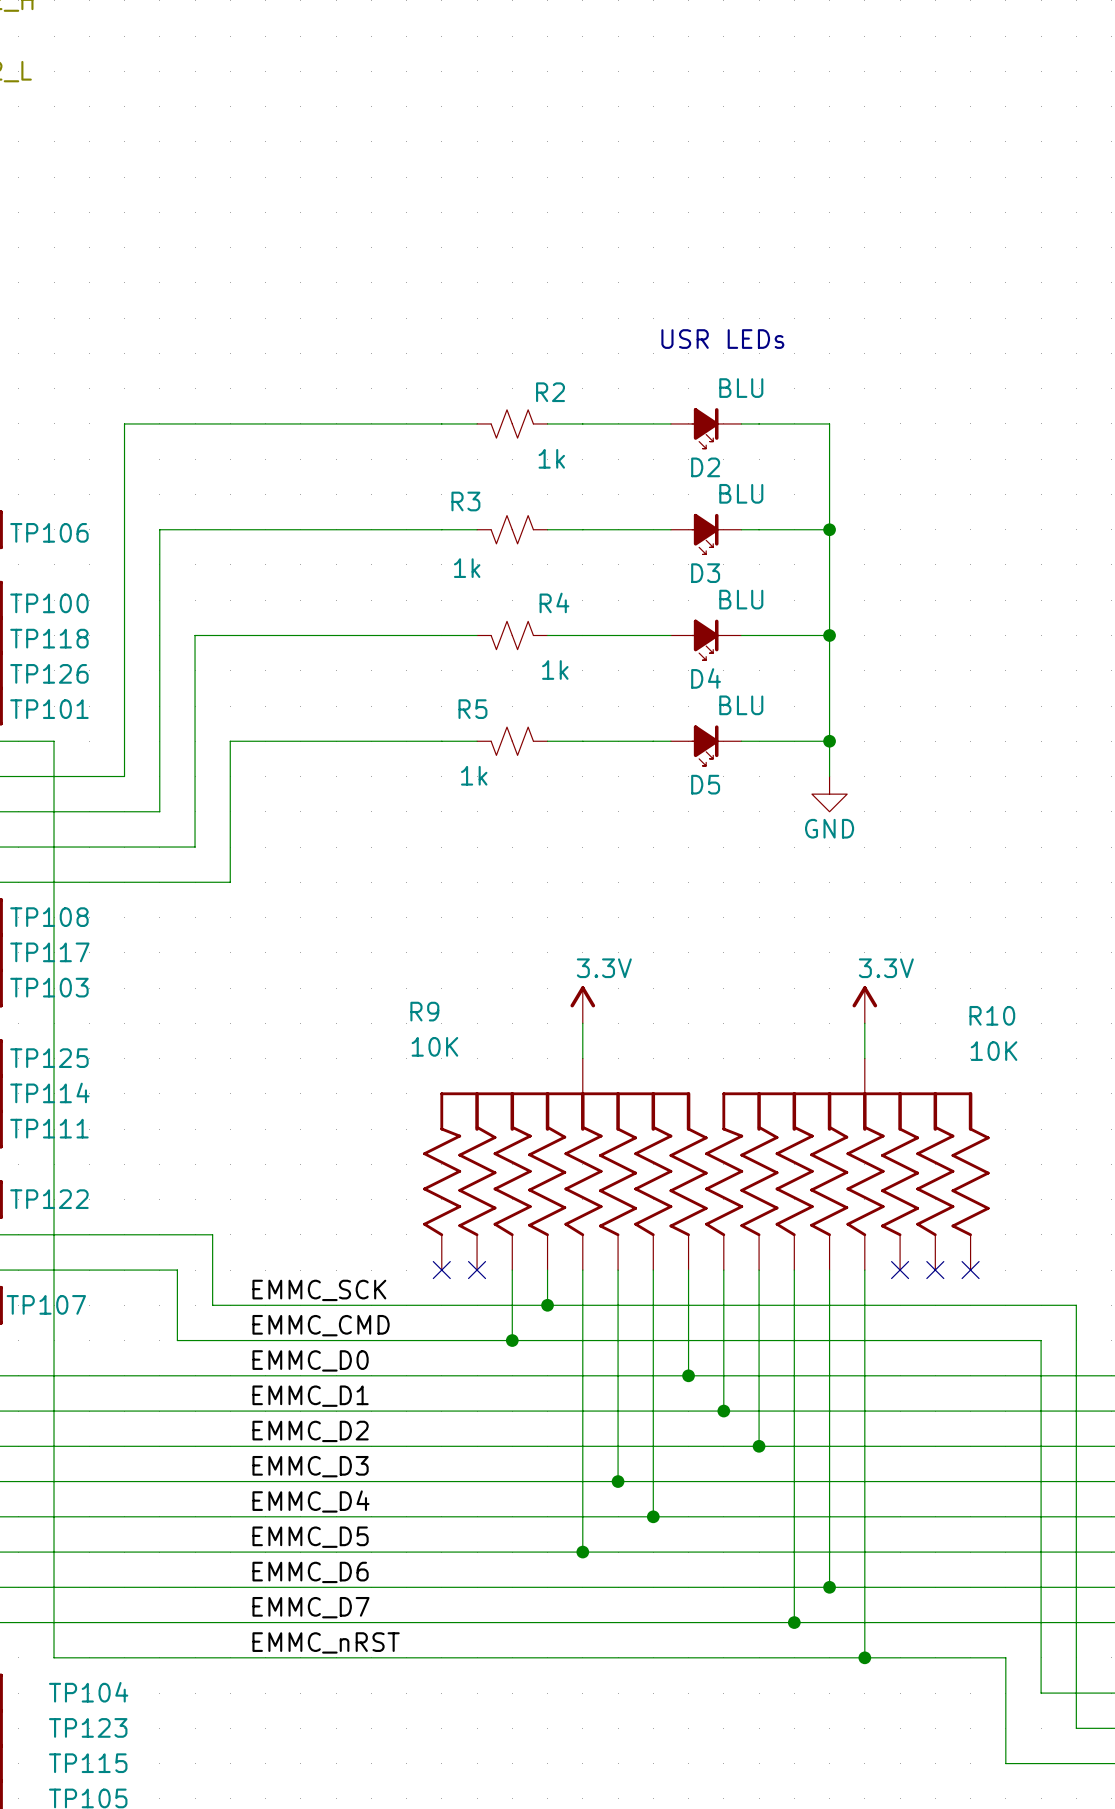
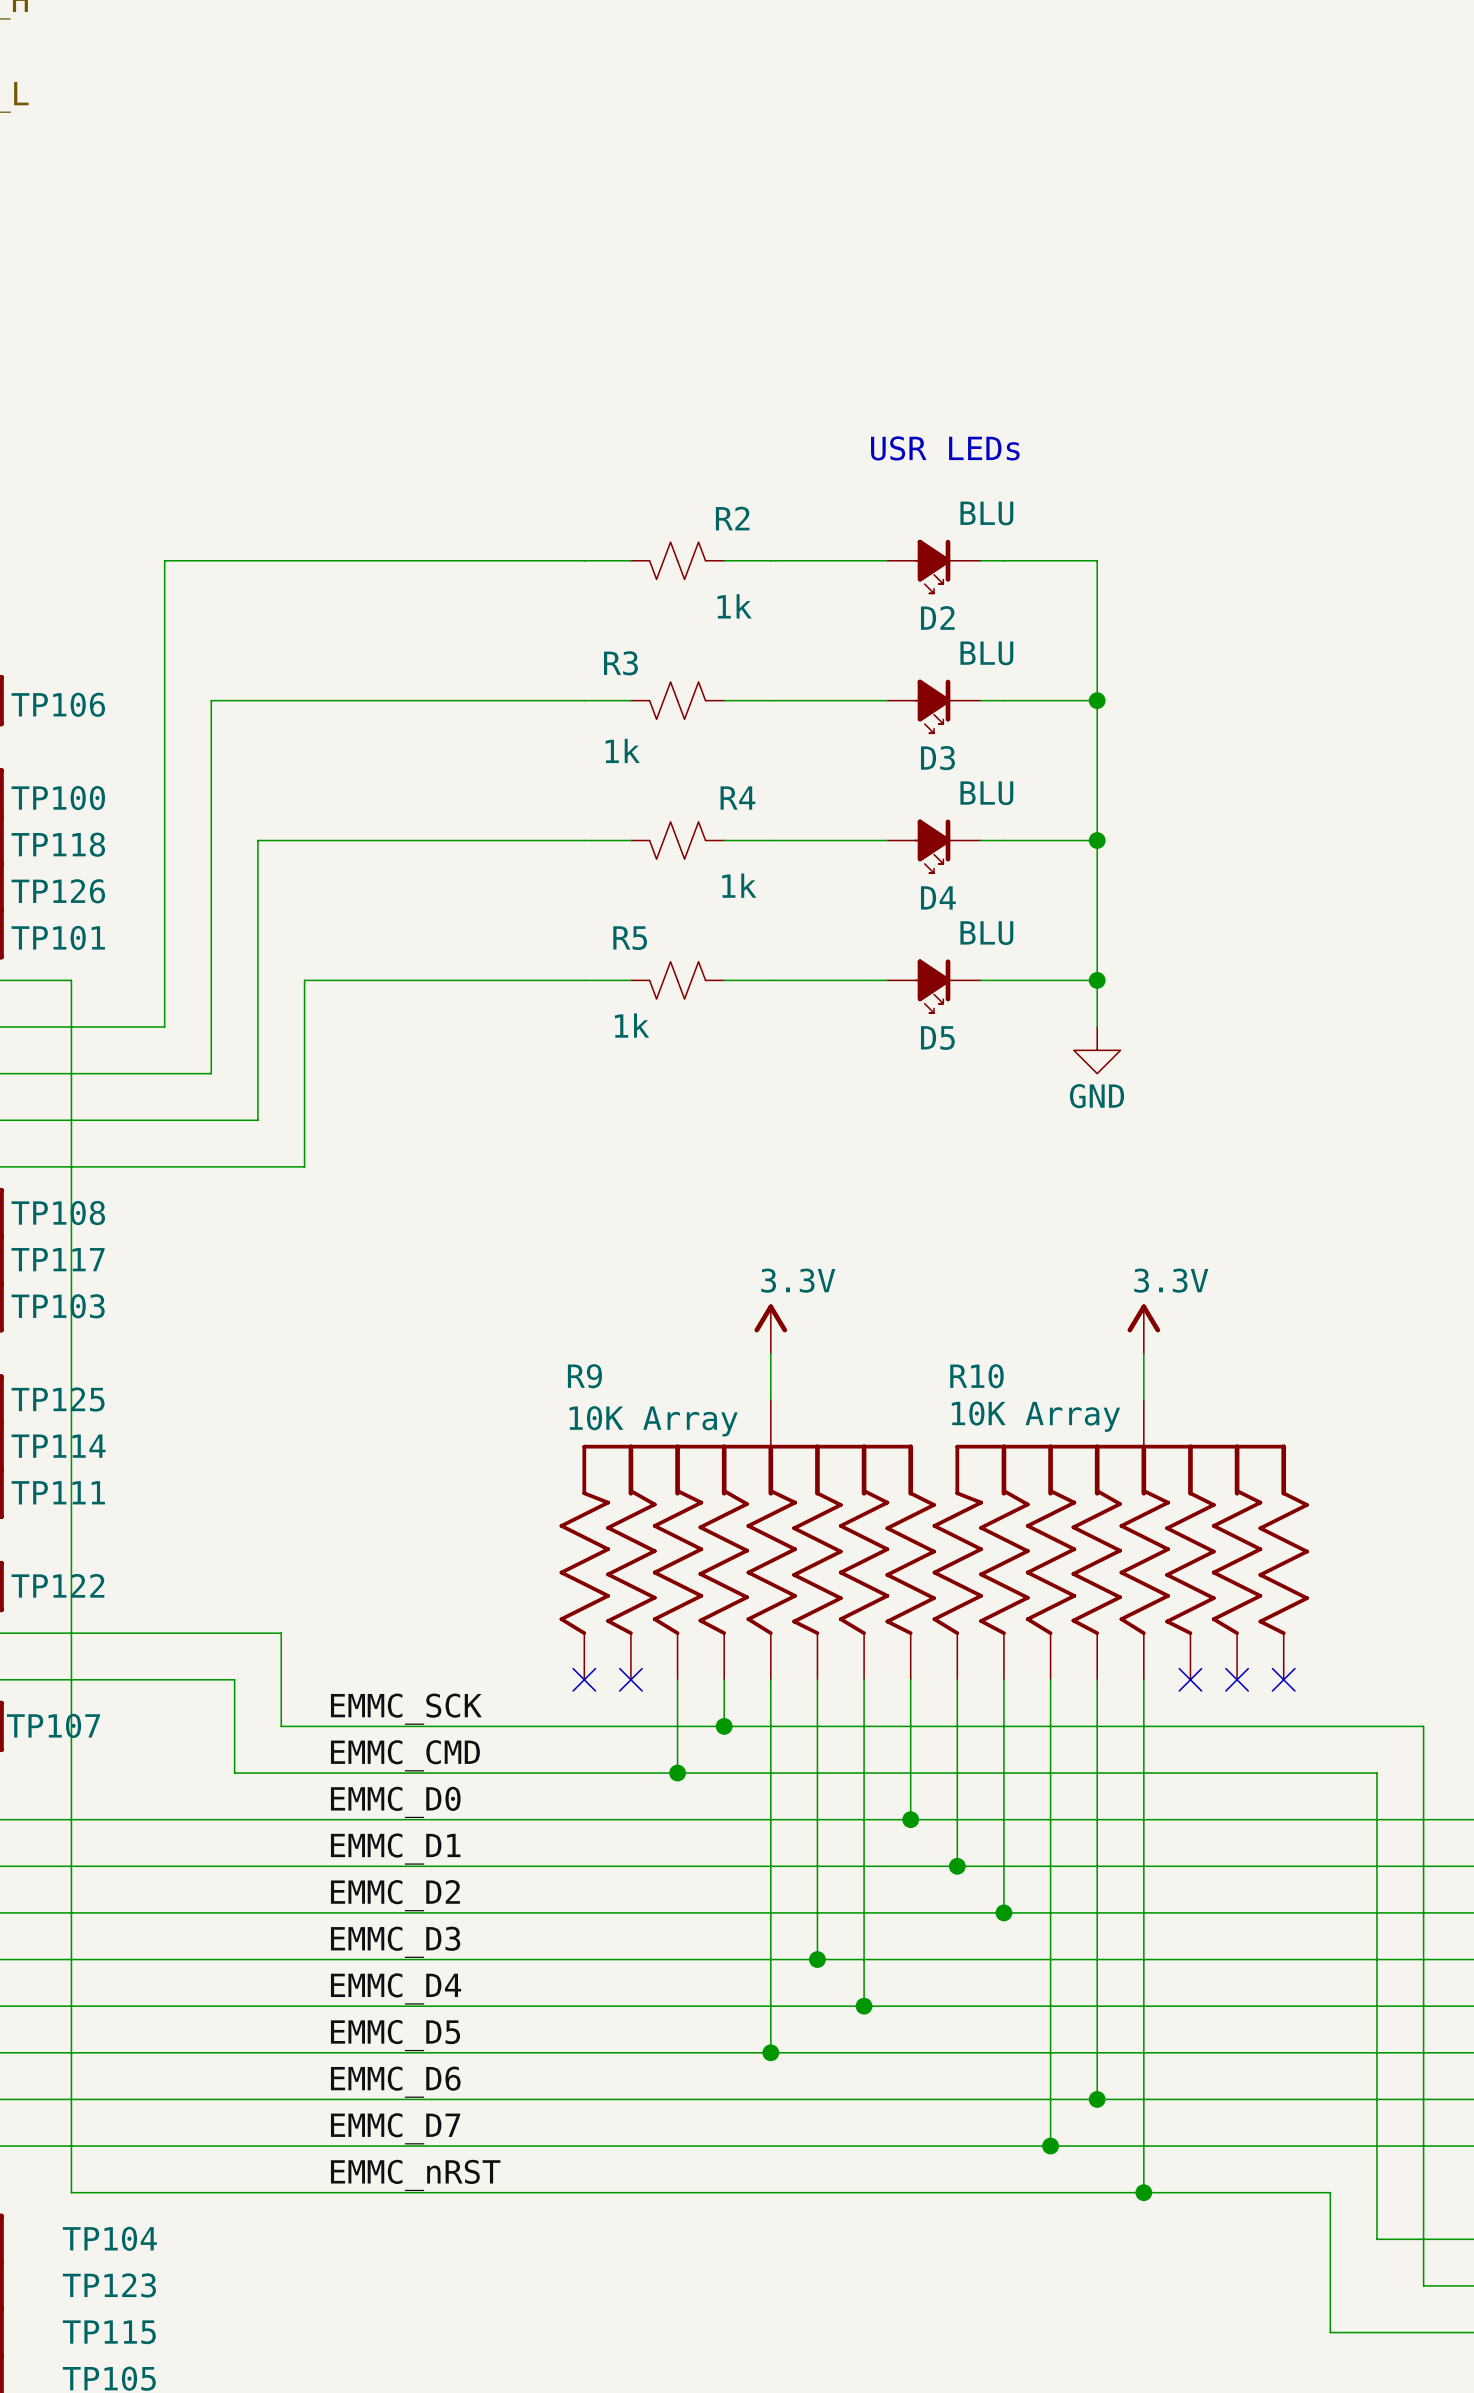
R9 name position: R9 (424, 1011) -> R9 (584, 1376)
R10 name position: R10 (992, 1015) -> R10 (976, 1376)
R9 value: 10K (434, 1046) -> 10K Array (653, 1421)
R10 value: 10K (994, 1051) -> 10K Array (1035, 1416)

